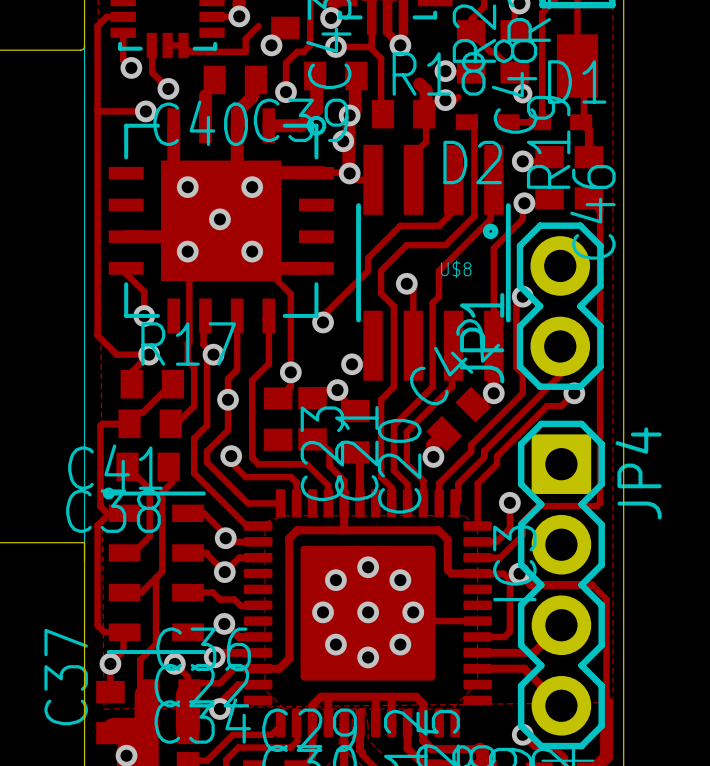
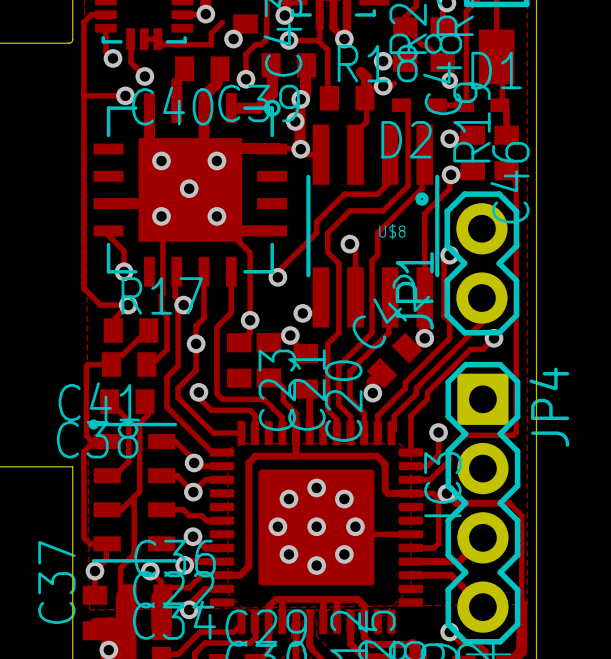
line: (84, 45) (84, 561) -> none

